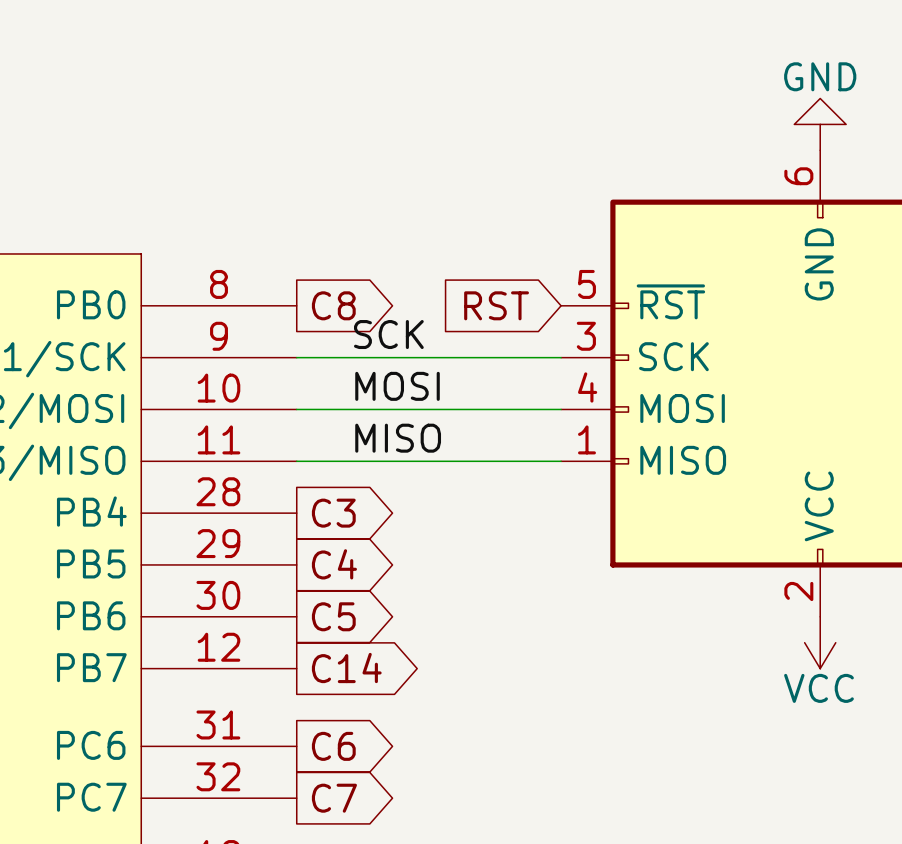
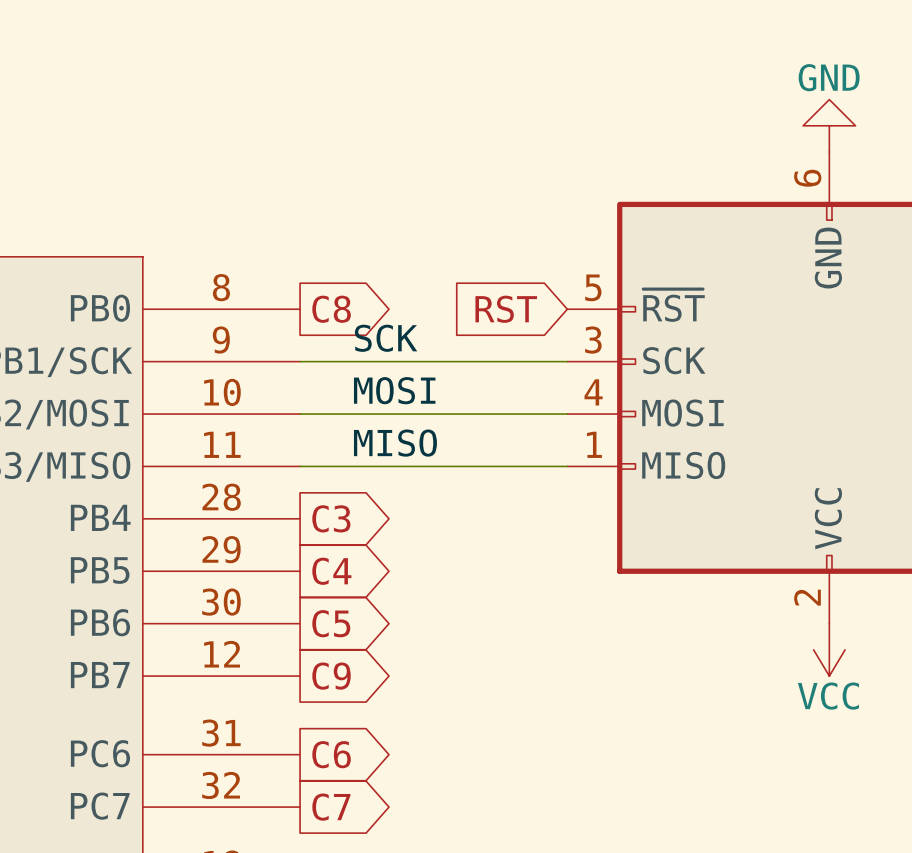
global label: C14 (346, 668) -> C9 (331, 676)

